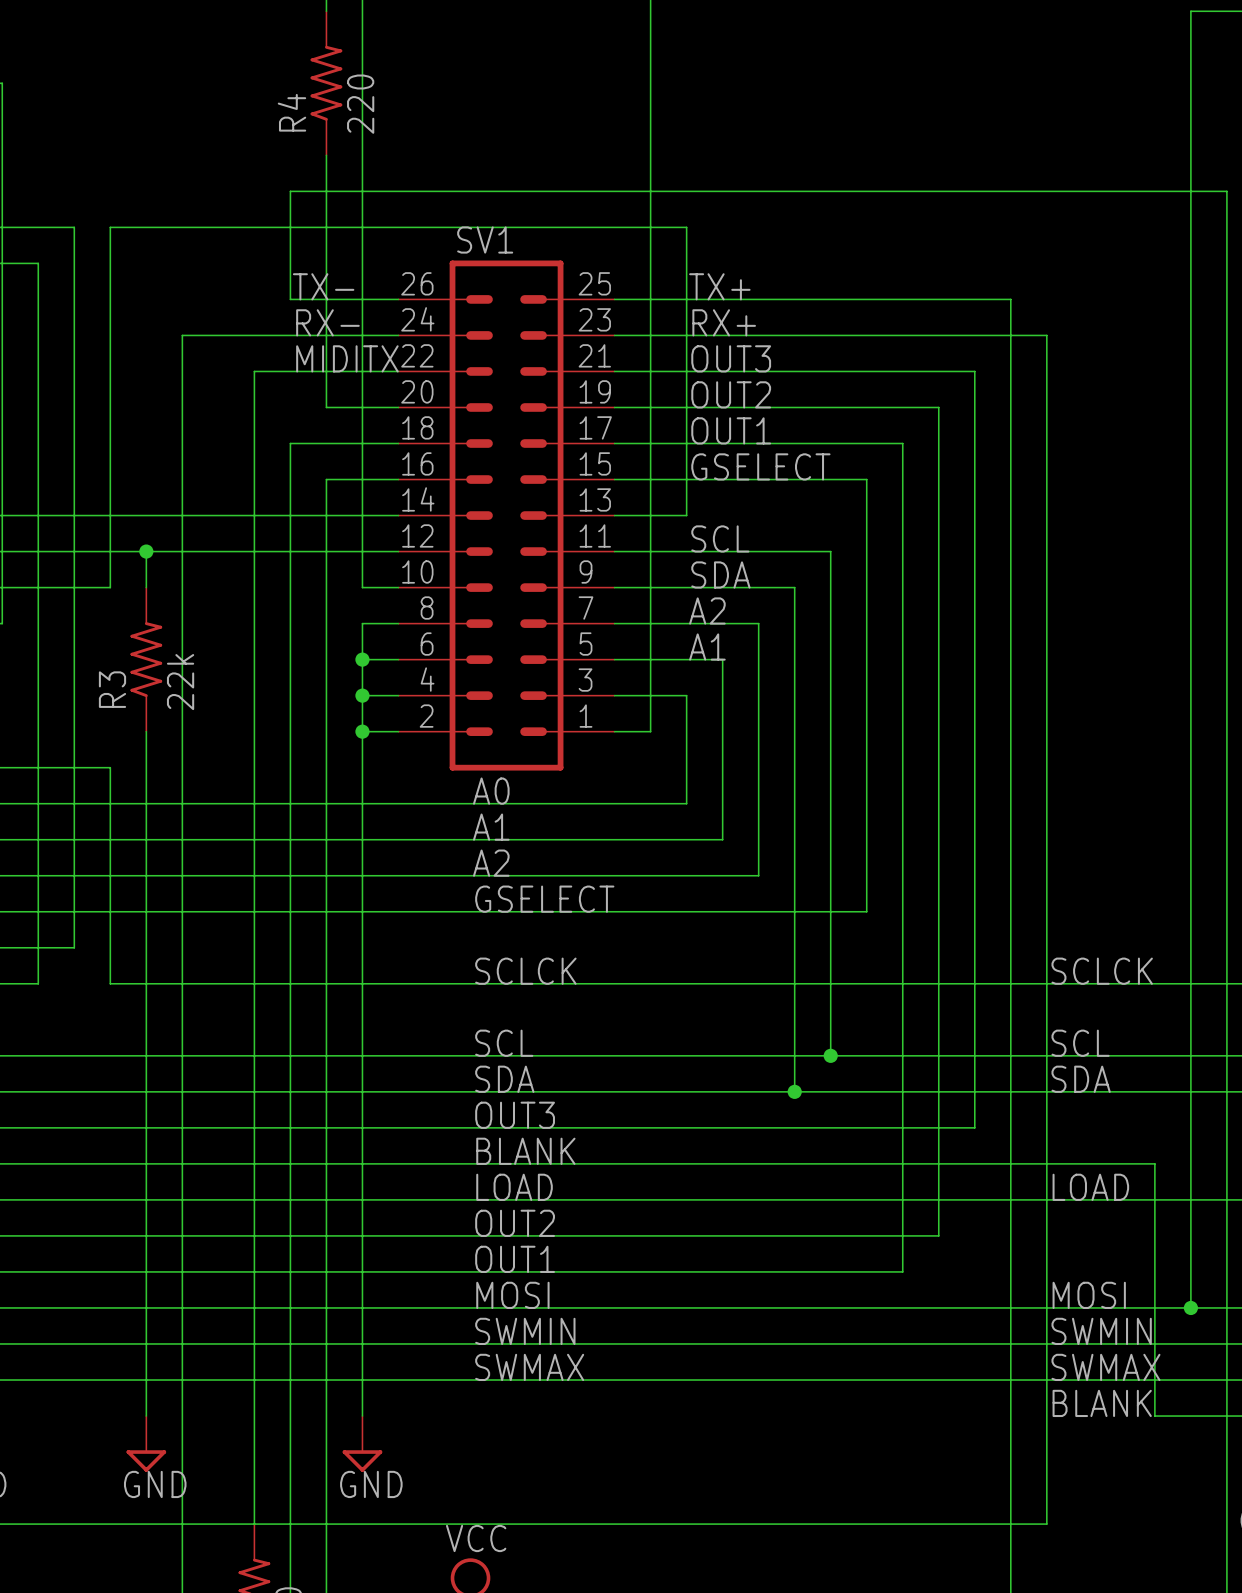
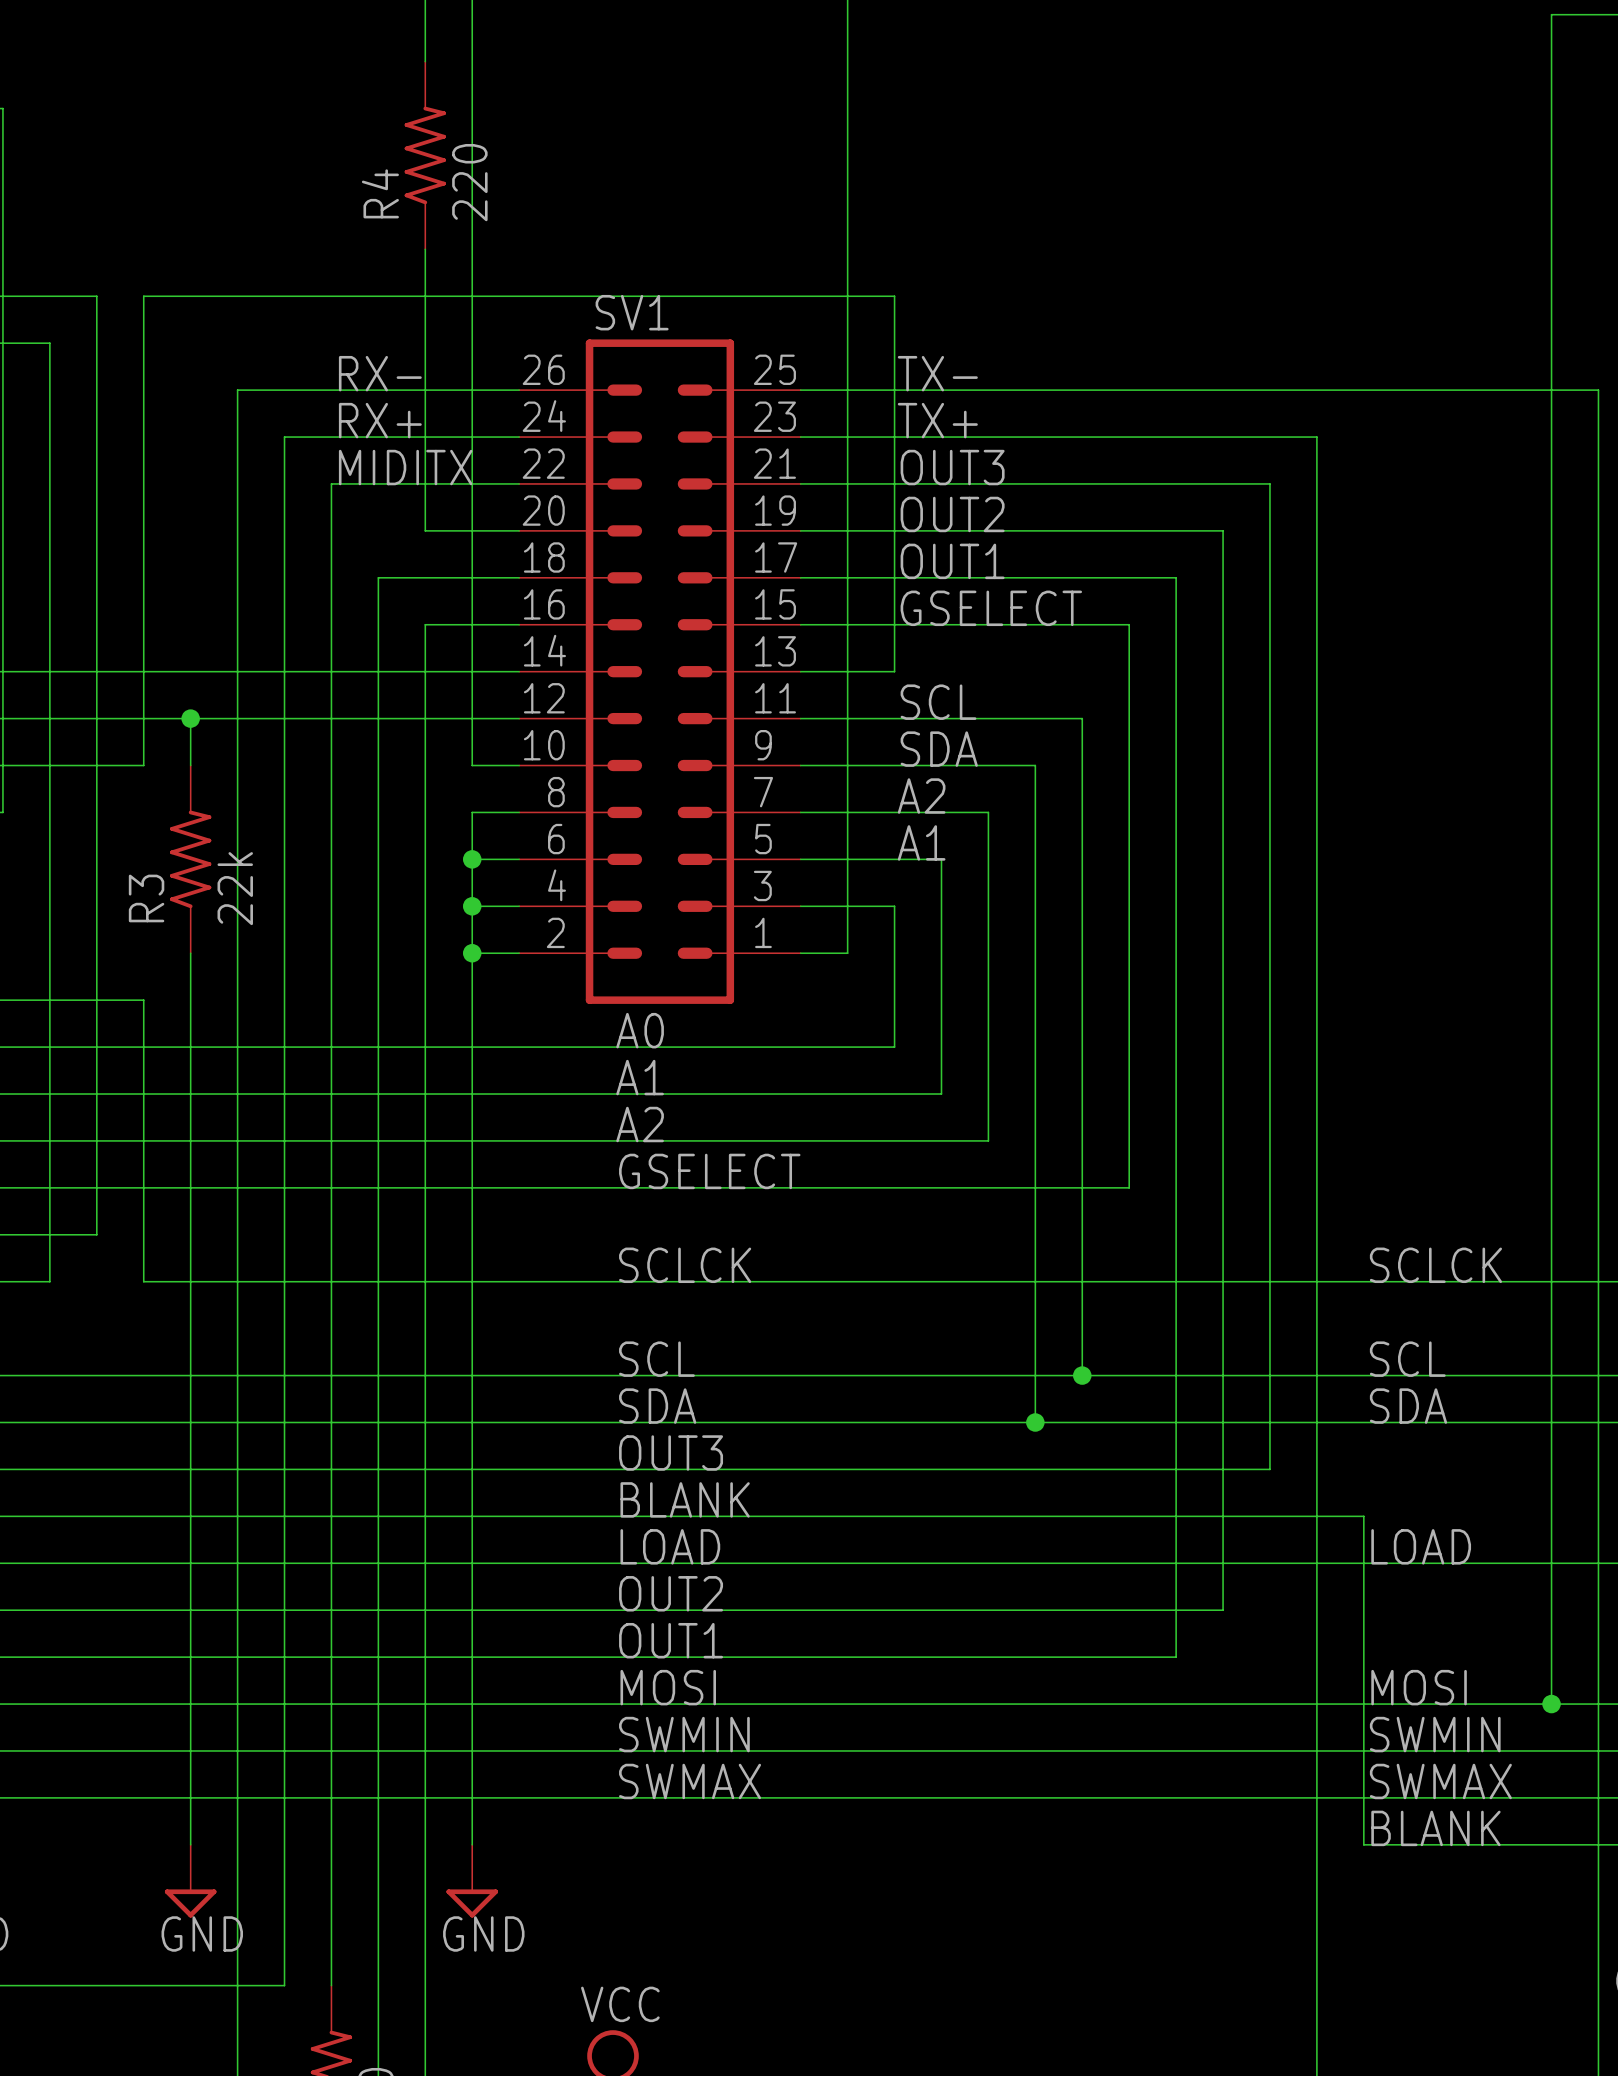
R4 position: (326, 83) -> (425, 155)
label: TX- (323, 286) -> none
label: TX+ (719, 286) -> TX- (937, 373)
wire: (290, 299) (290, 191) (1226, 191) (1226, 299) -> (1316, 390) (1598, 390)
wire: (1010, 299) (1010, 335) (1046, 335) (1046, 1163) (1154, 1163) (1154, 1416) -> none
label: none -> RX+ (380, 420)
label position: RX- (327, 322) -> RX- (380, 373)
label: RX+ (724, 322) -> TX+ (937, 420)
wire: (182, 335) (218, 335) -> (237, 437) (237, 390) (378, 390)
wire: none -> (284, 437) (284, 1985)
label position: MIDITX (347, 358) -> MIDITX (405, 467)
wire: (1046, 1416) (1046, 1524) (218, 1524) -> (1363, 1844) (1504, 1844)

